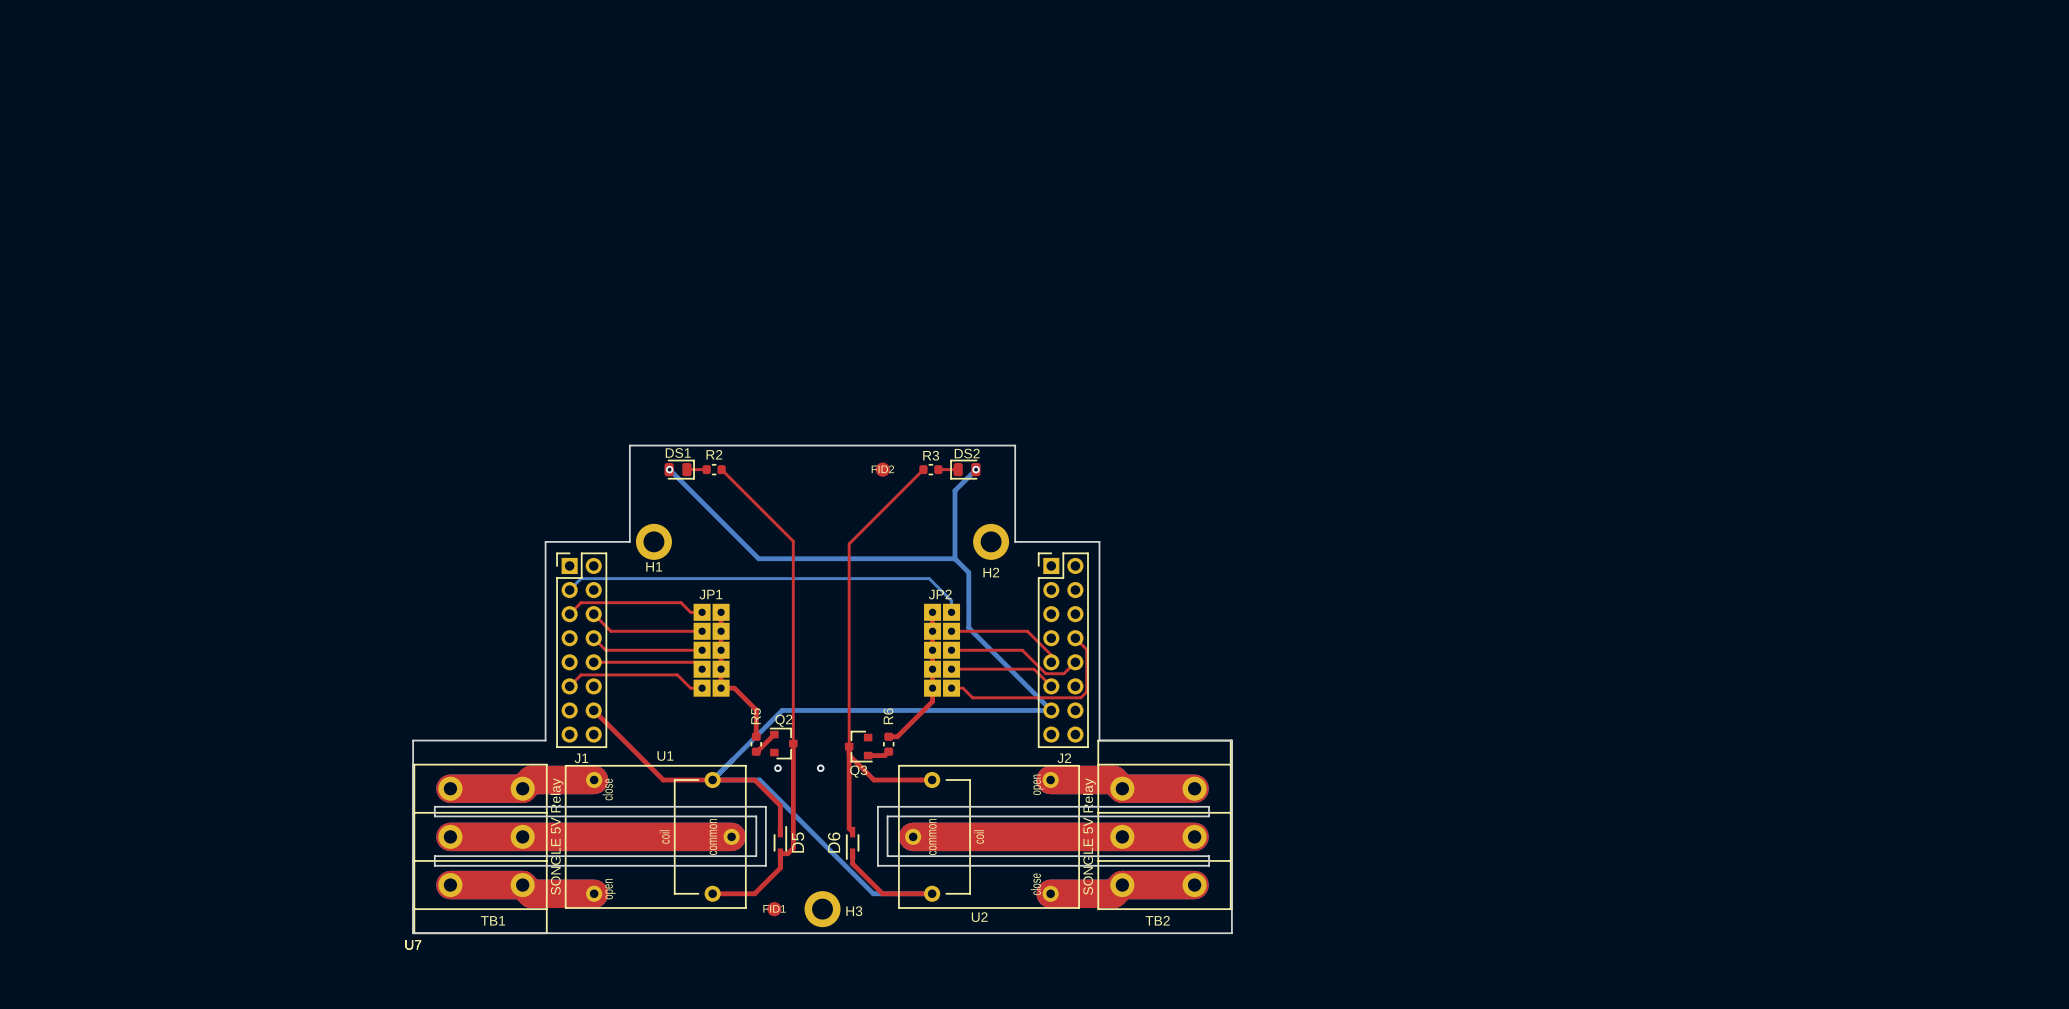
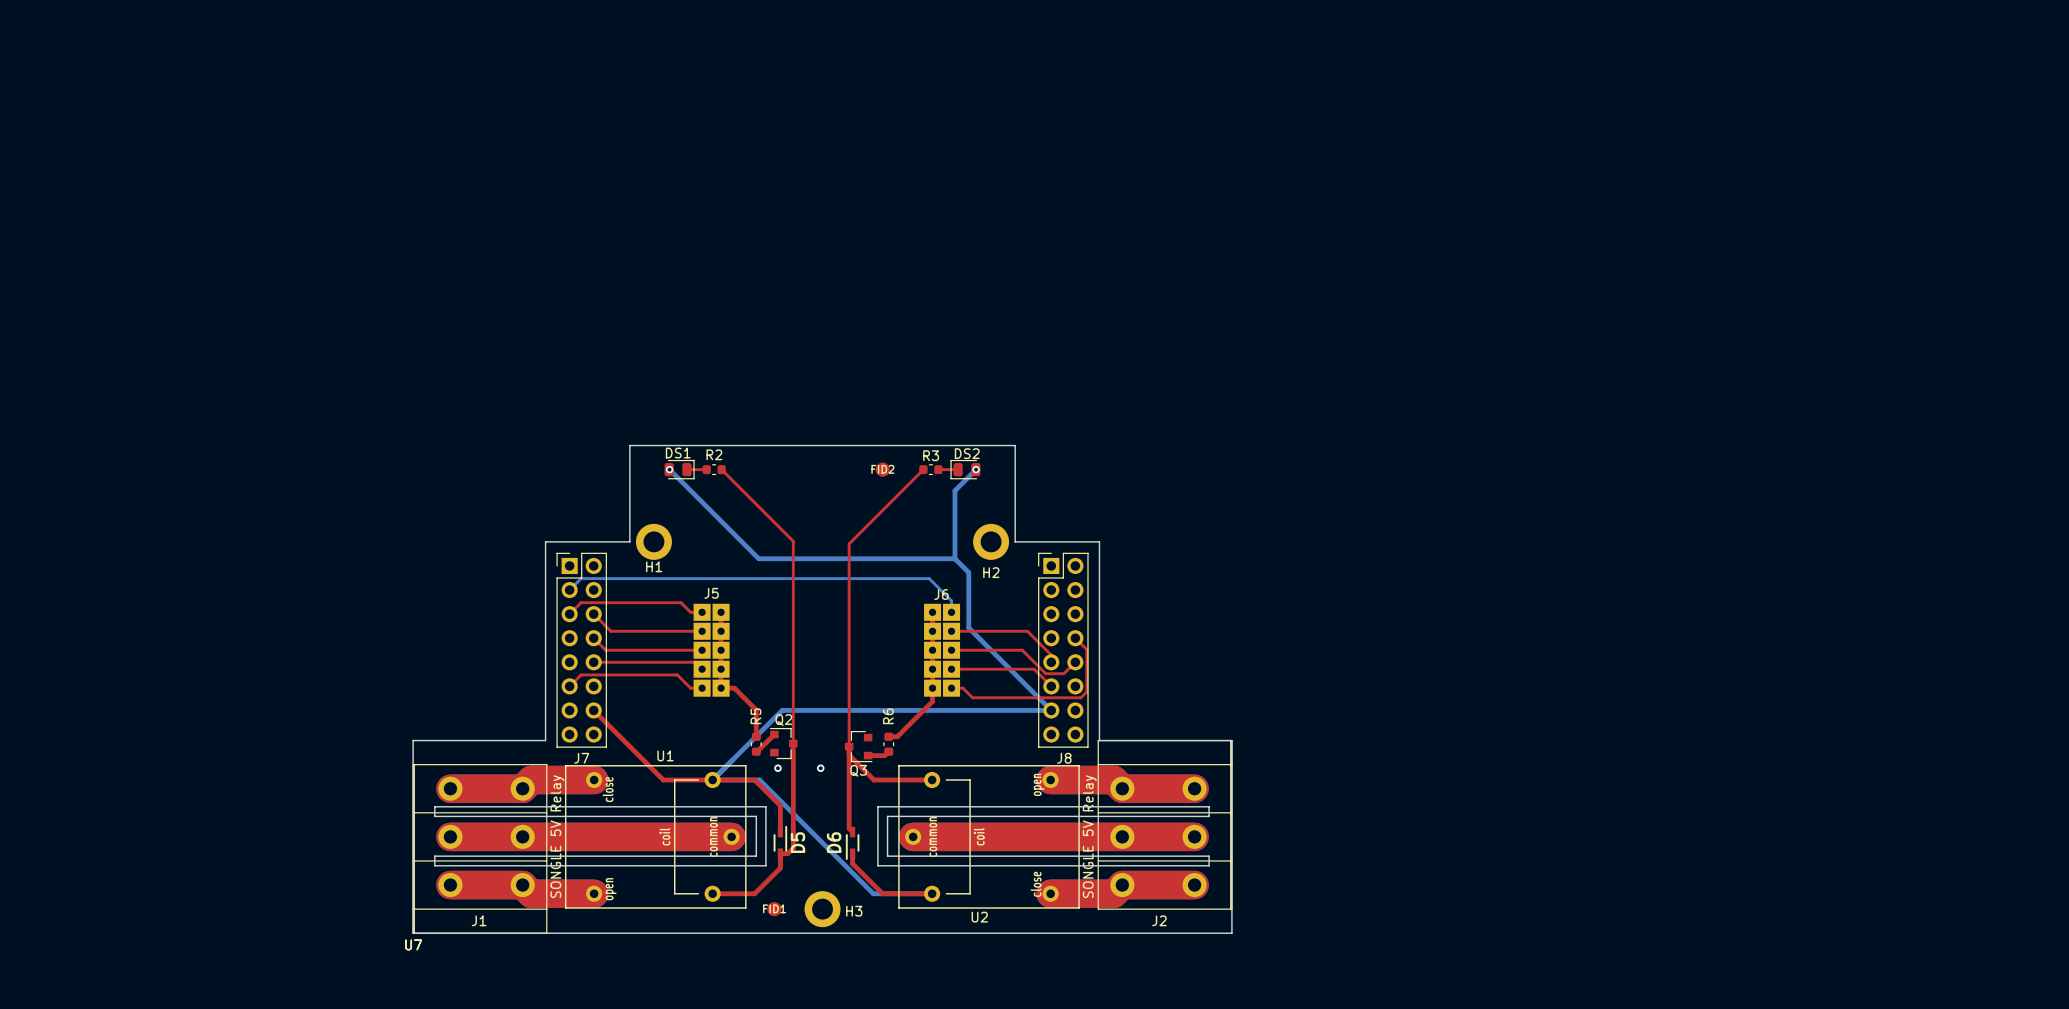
JP1 name: JP1 (710, 594) -> J5 (711, 593)
JP2 name: JP2 (940, 594) -> J6 (941, 594)
J1 name: J1 (581, 758) -> J7 (581, 758)
J2 name: J2 (1064, 758) -> J8 (1064, 758)
TB1 name: TB1 (493, 920) -> J1 (479, 920)
TB2 name: TB2 (1157, 920) -> J2 (1159, 920)

